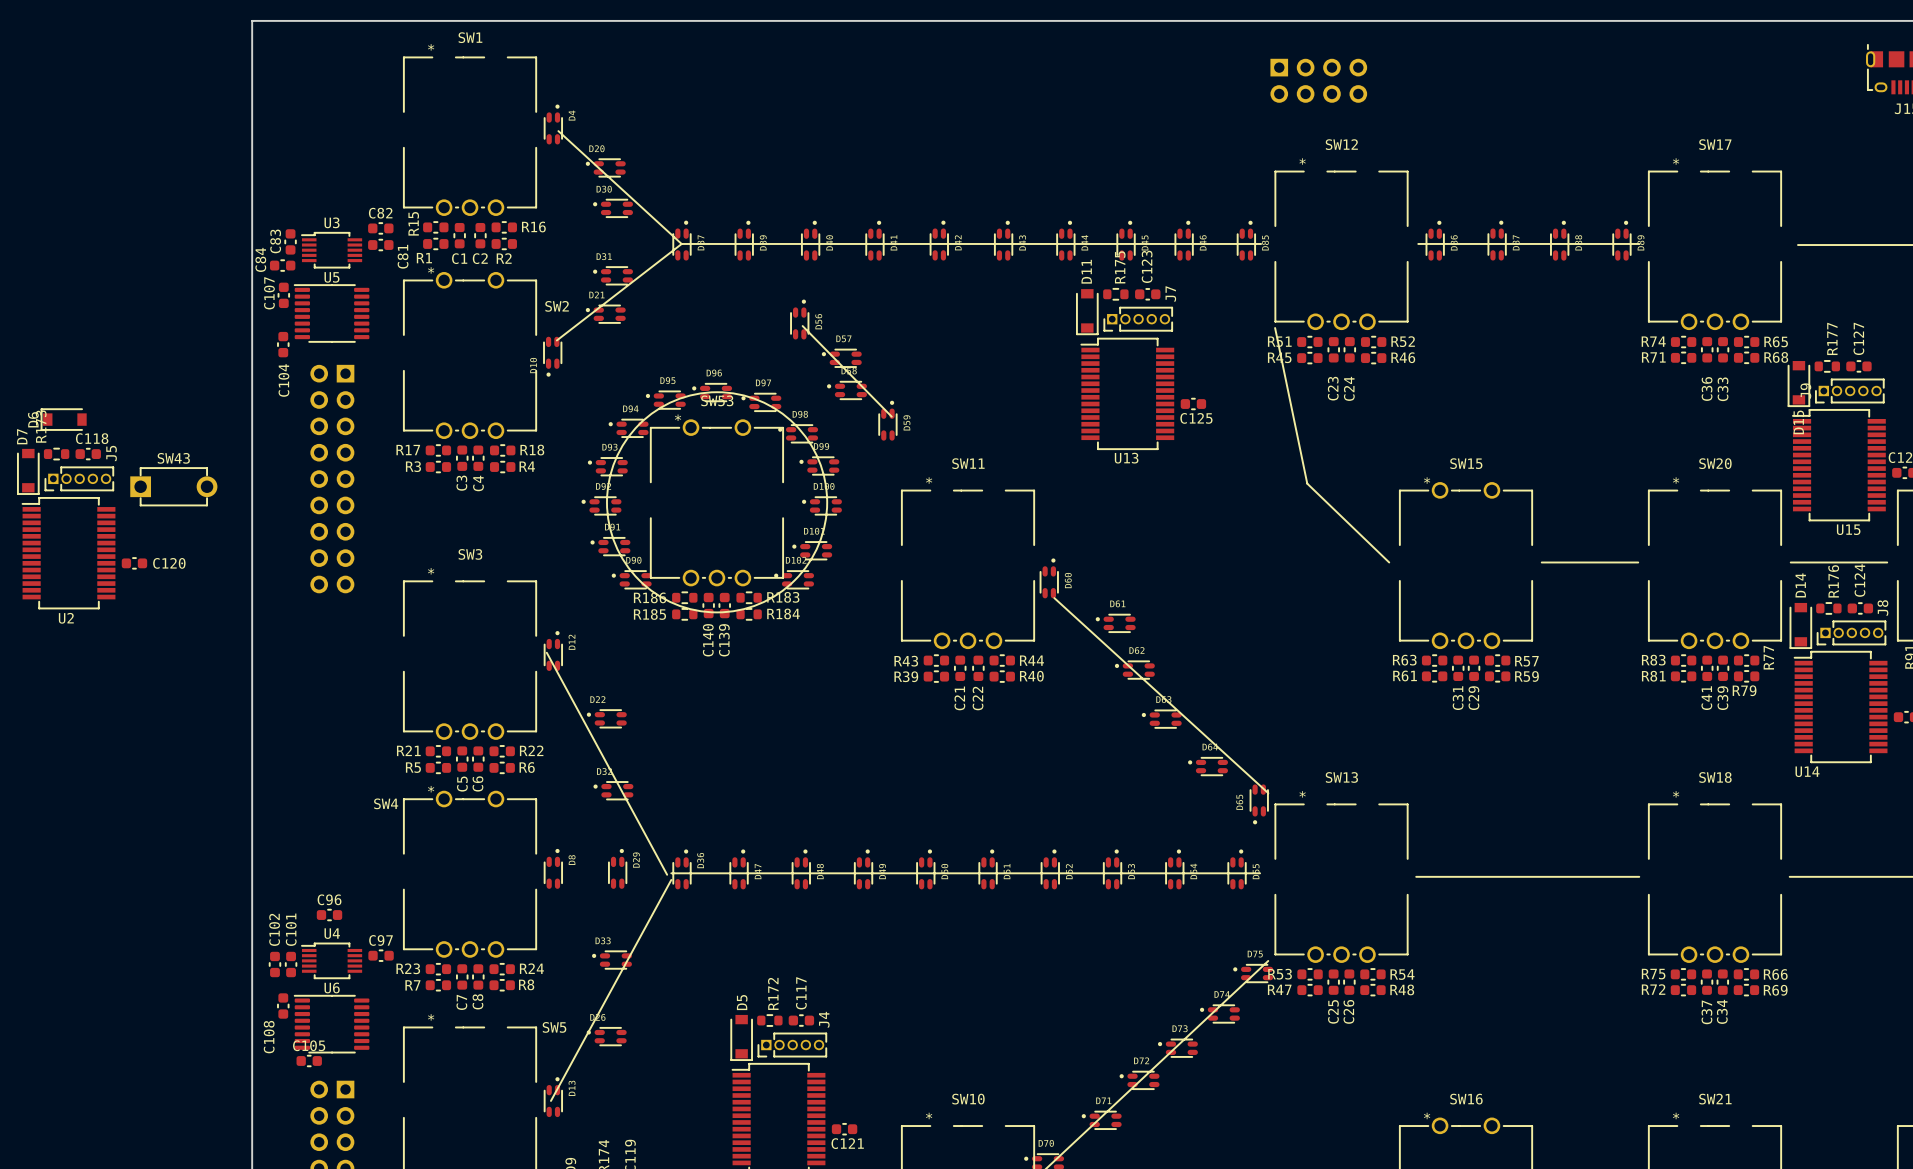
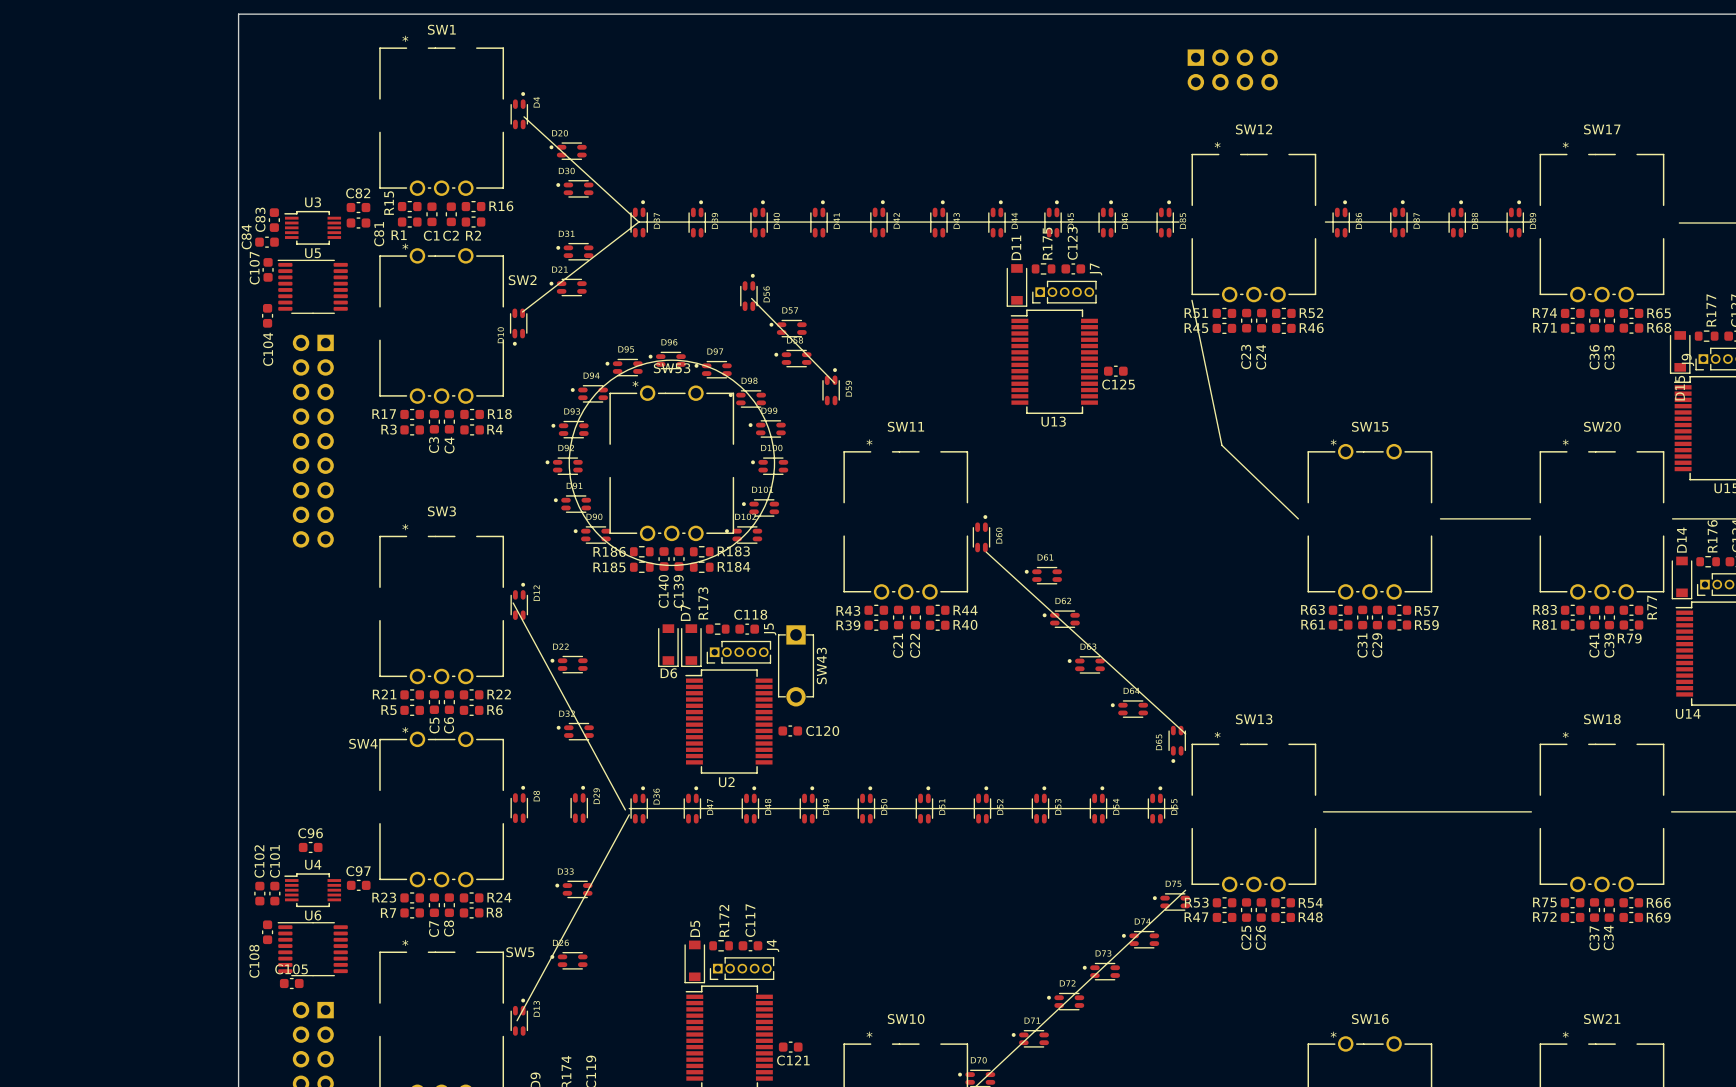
D6 rotation: 0° (63, 419) -> 90° counterclockwise (668, 645)
D6 position: (63, 419) -> (668, 645)
R173 position: (56, 454) -> (717, 629)
C118 position: (88, 454) -> (747, 629)
D7 position: (28, 471) -> (691, 645)
J5 position: (79, 478) -> (738, 652)
SW43 rotation: 0° (173, 486) -> 90° clockwise (796, 665)
SW43 position: (173, 486) -> (796, 665)
U2 position: (68, 553) -> (728, 721)
C120 position: (134, 563) -> (790, 730)

